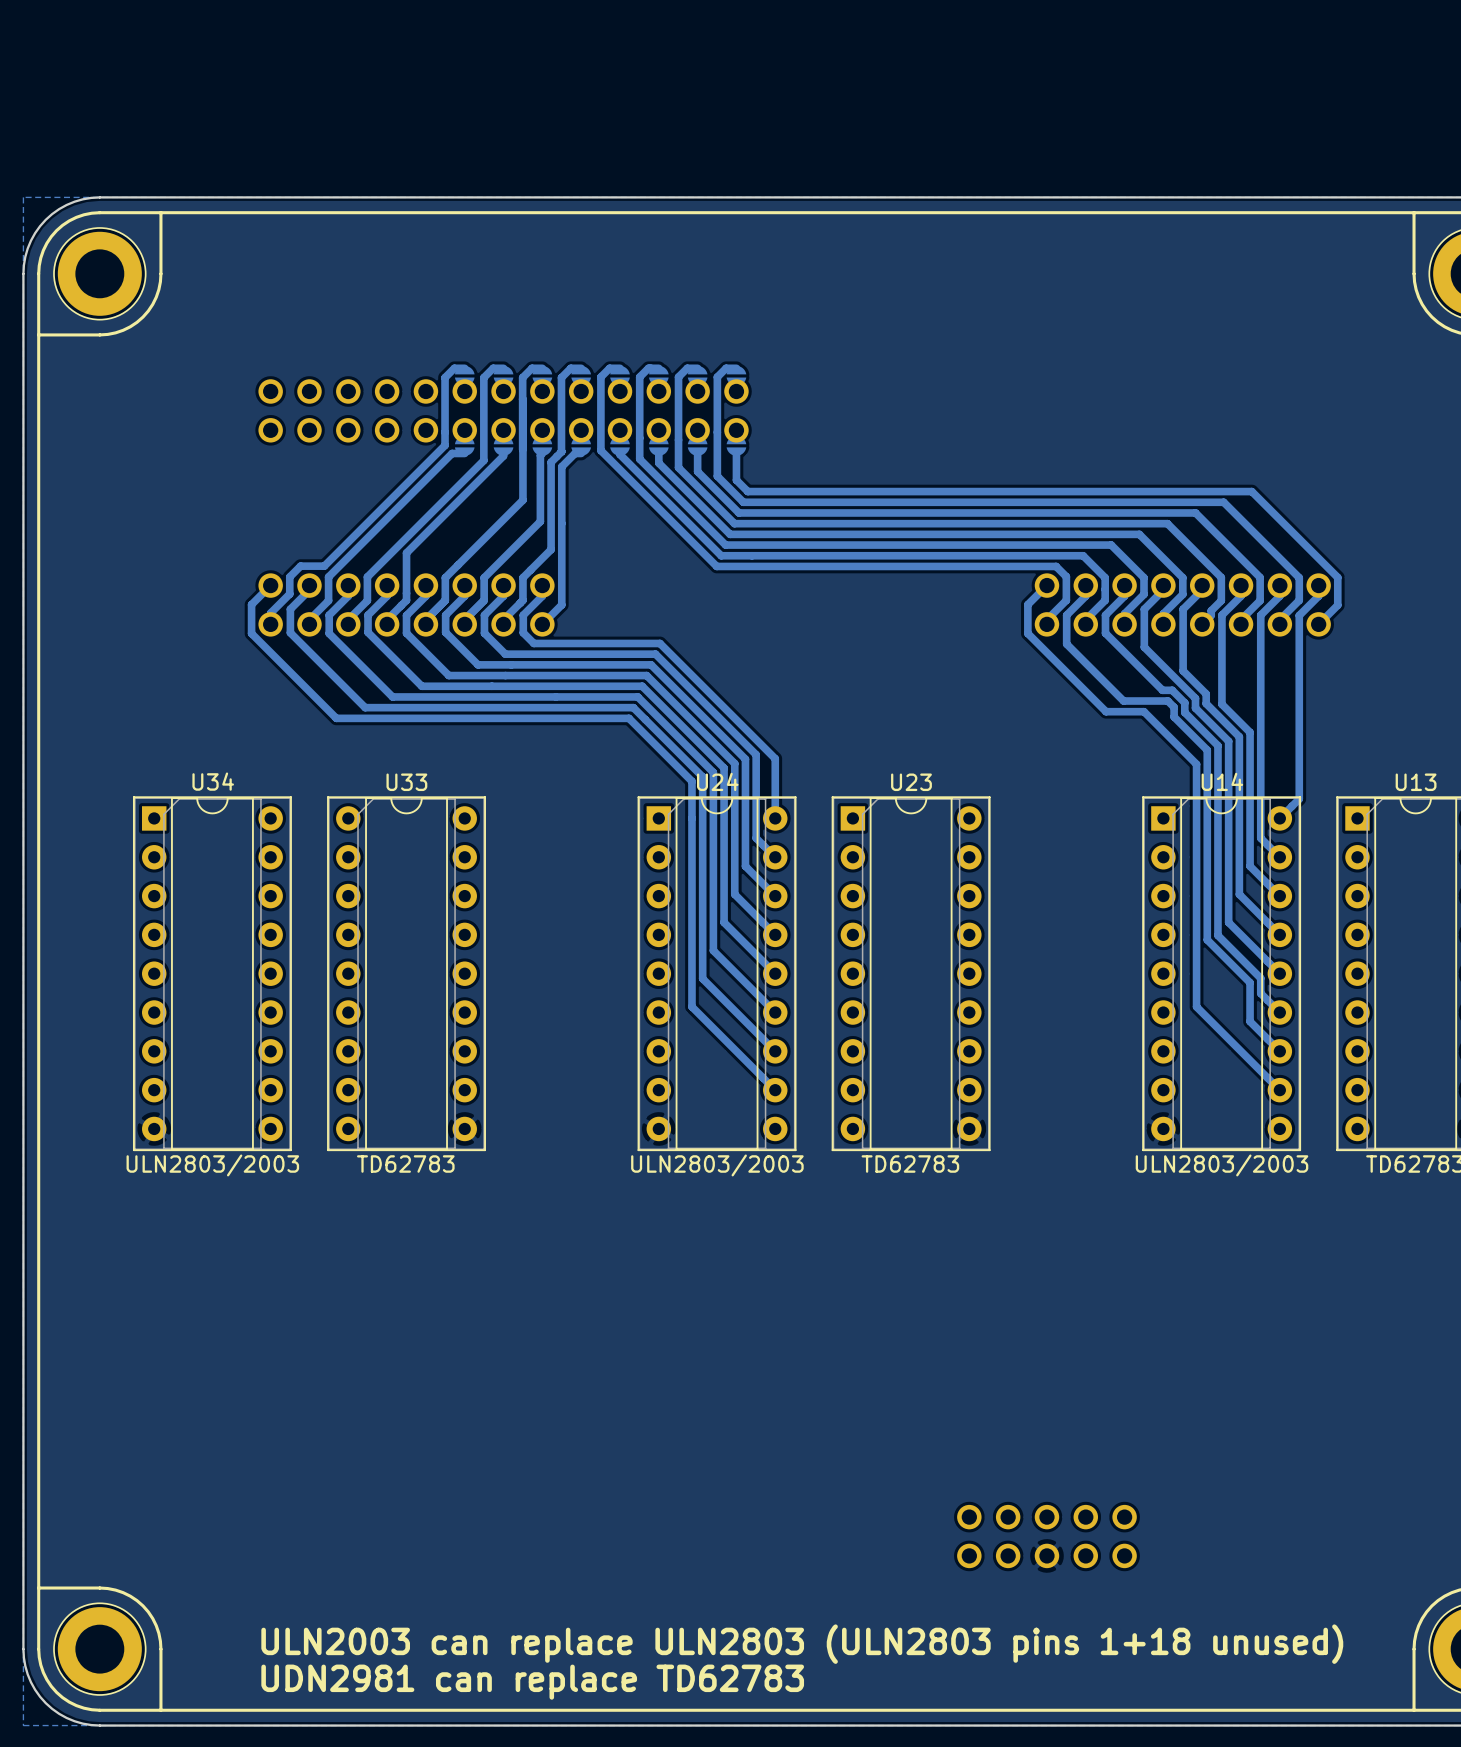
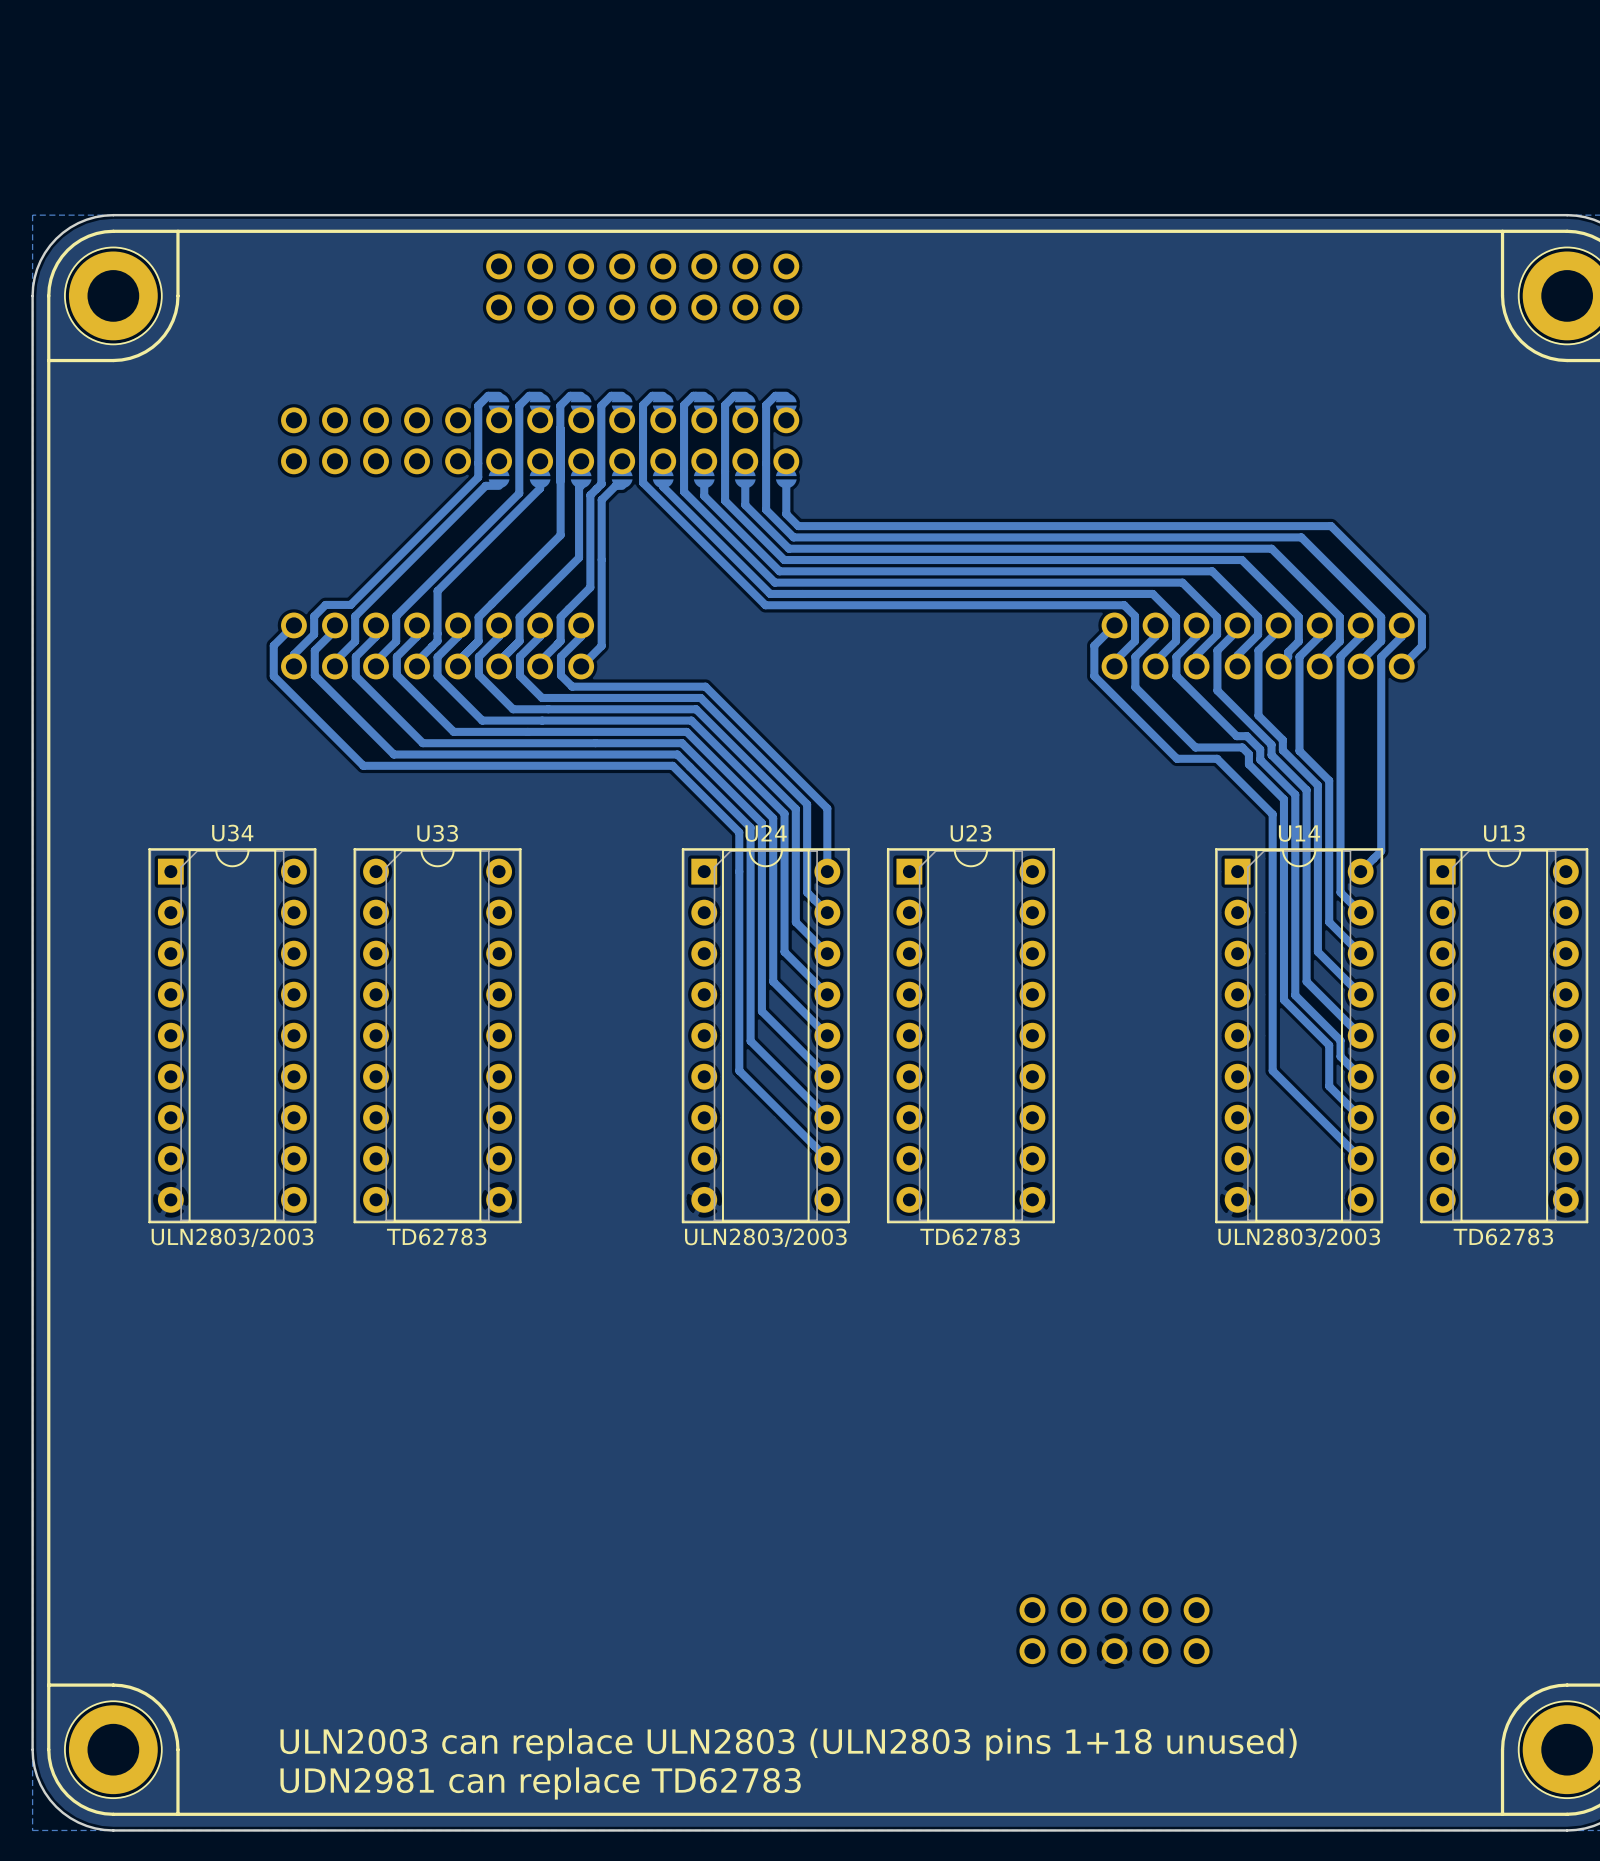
part: none -> (642, 286)

